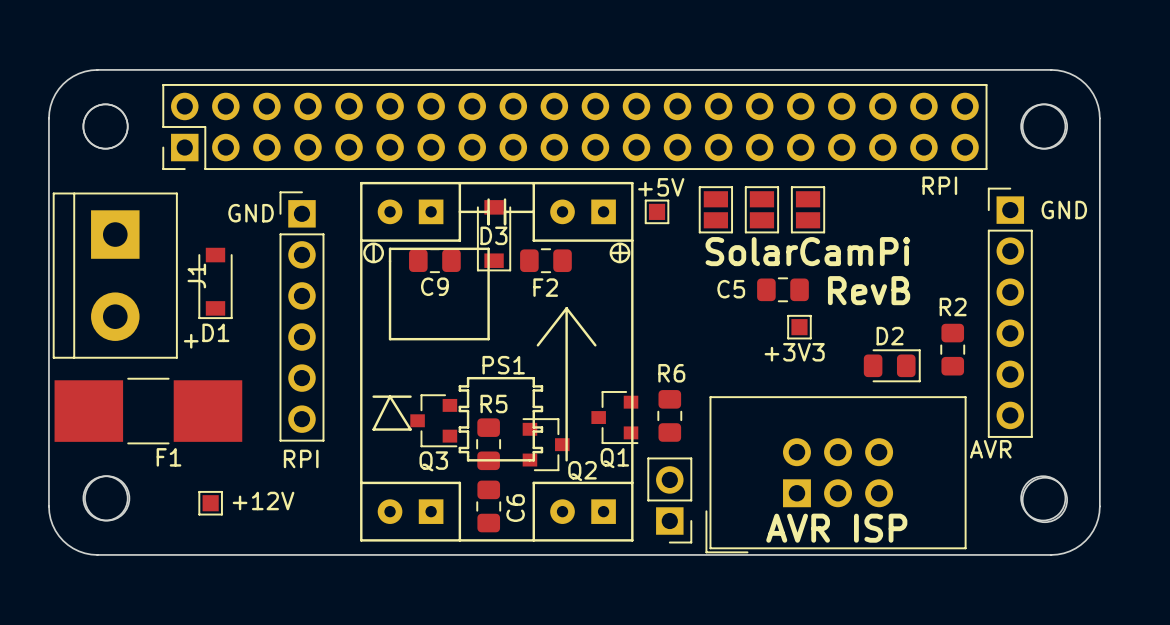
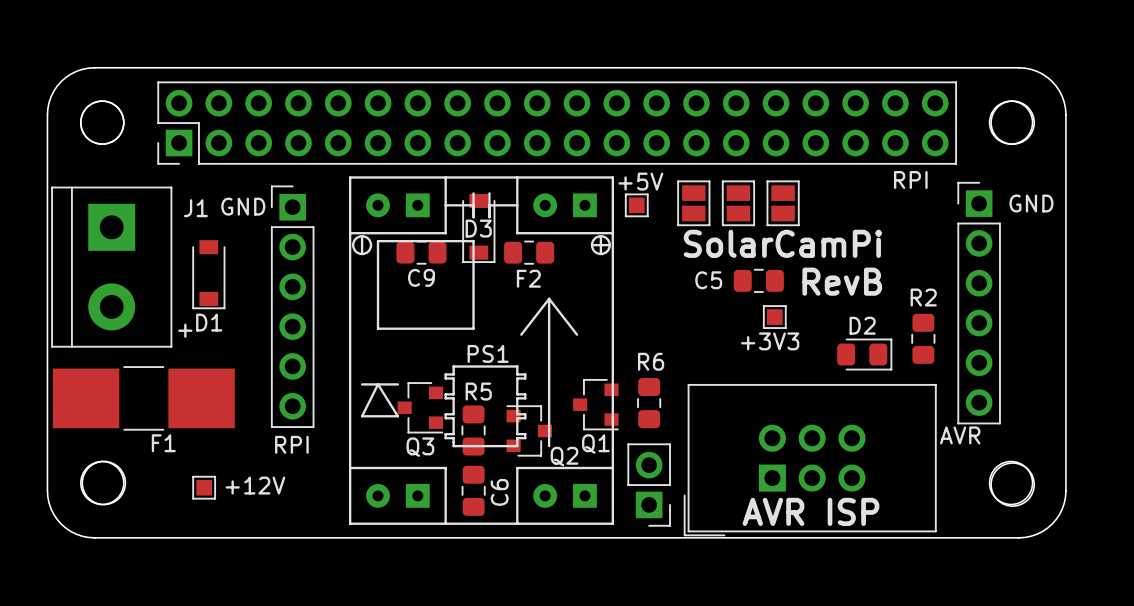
J1 name rotation: 0° (196, 276) -> 90° clockwise (195, 208)
J1 name position: J1 (196, 276) -> J1 (195, 208)

